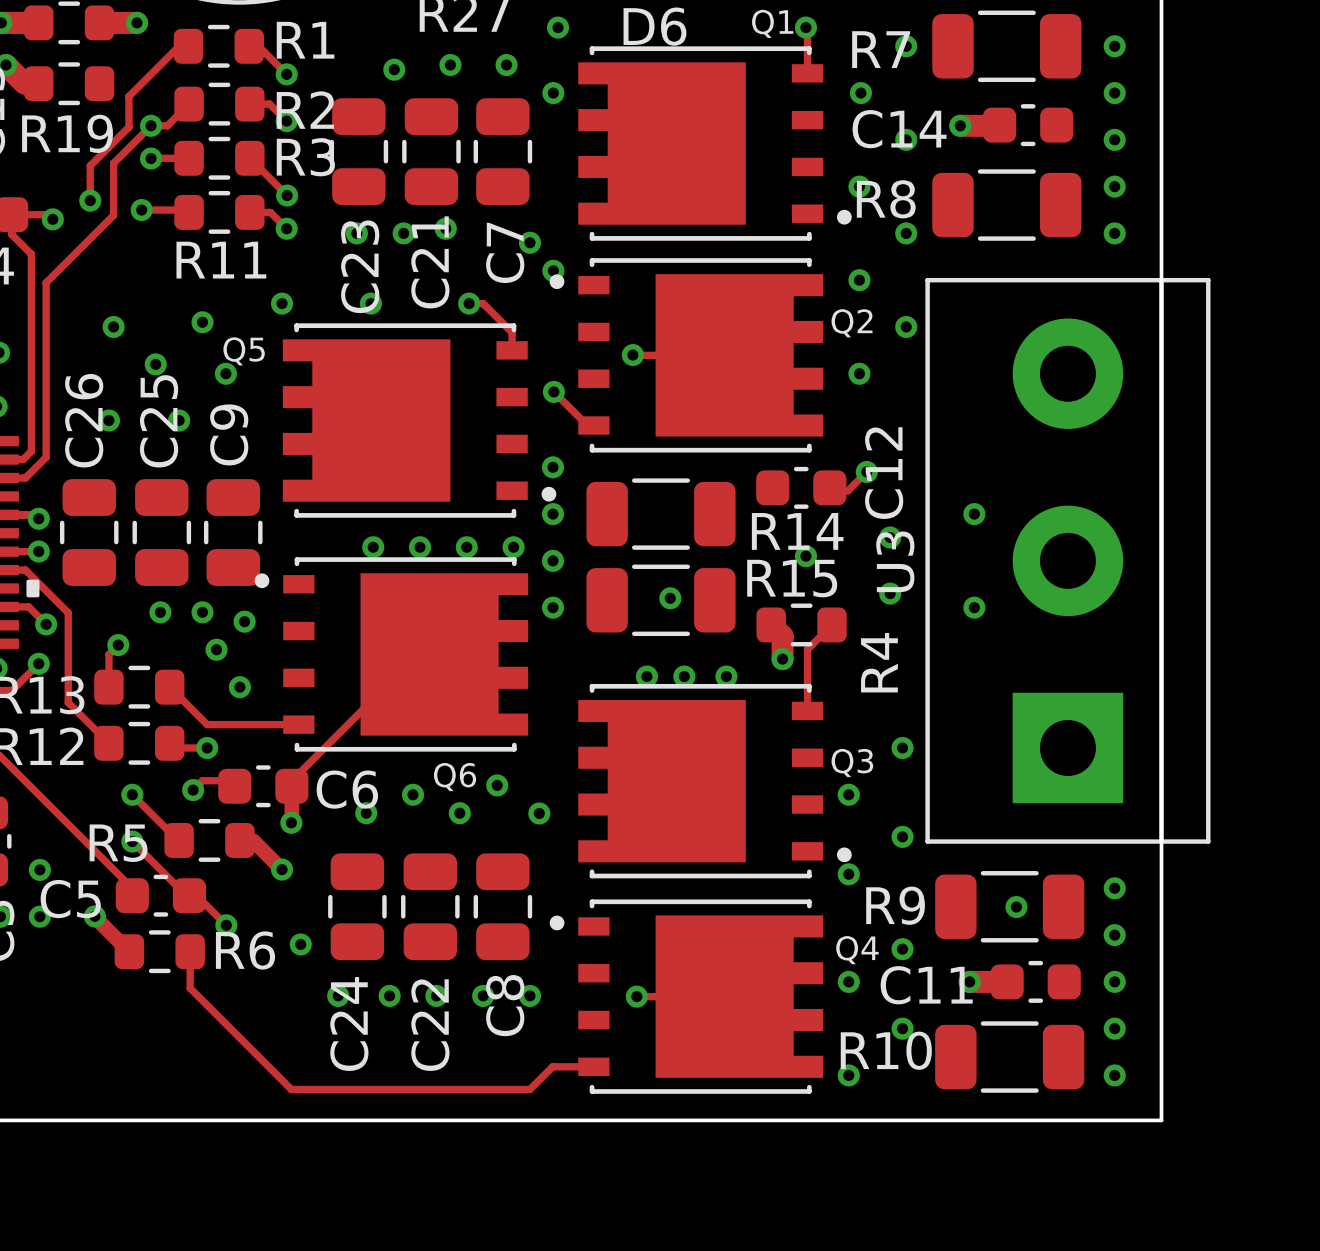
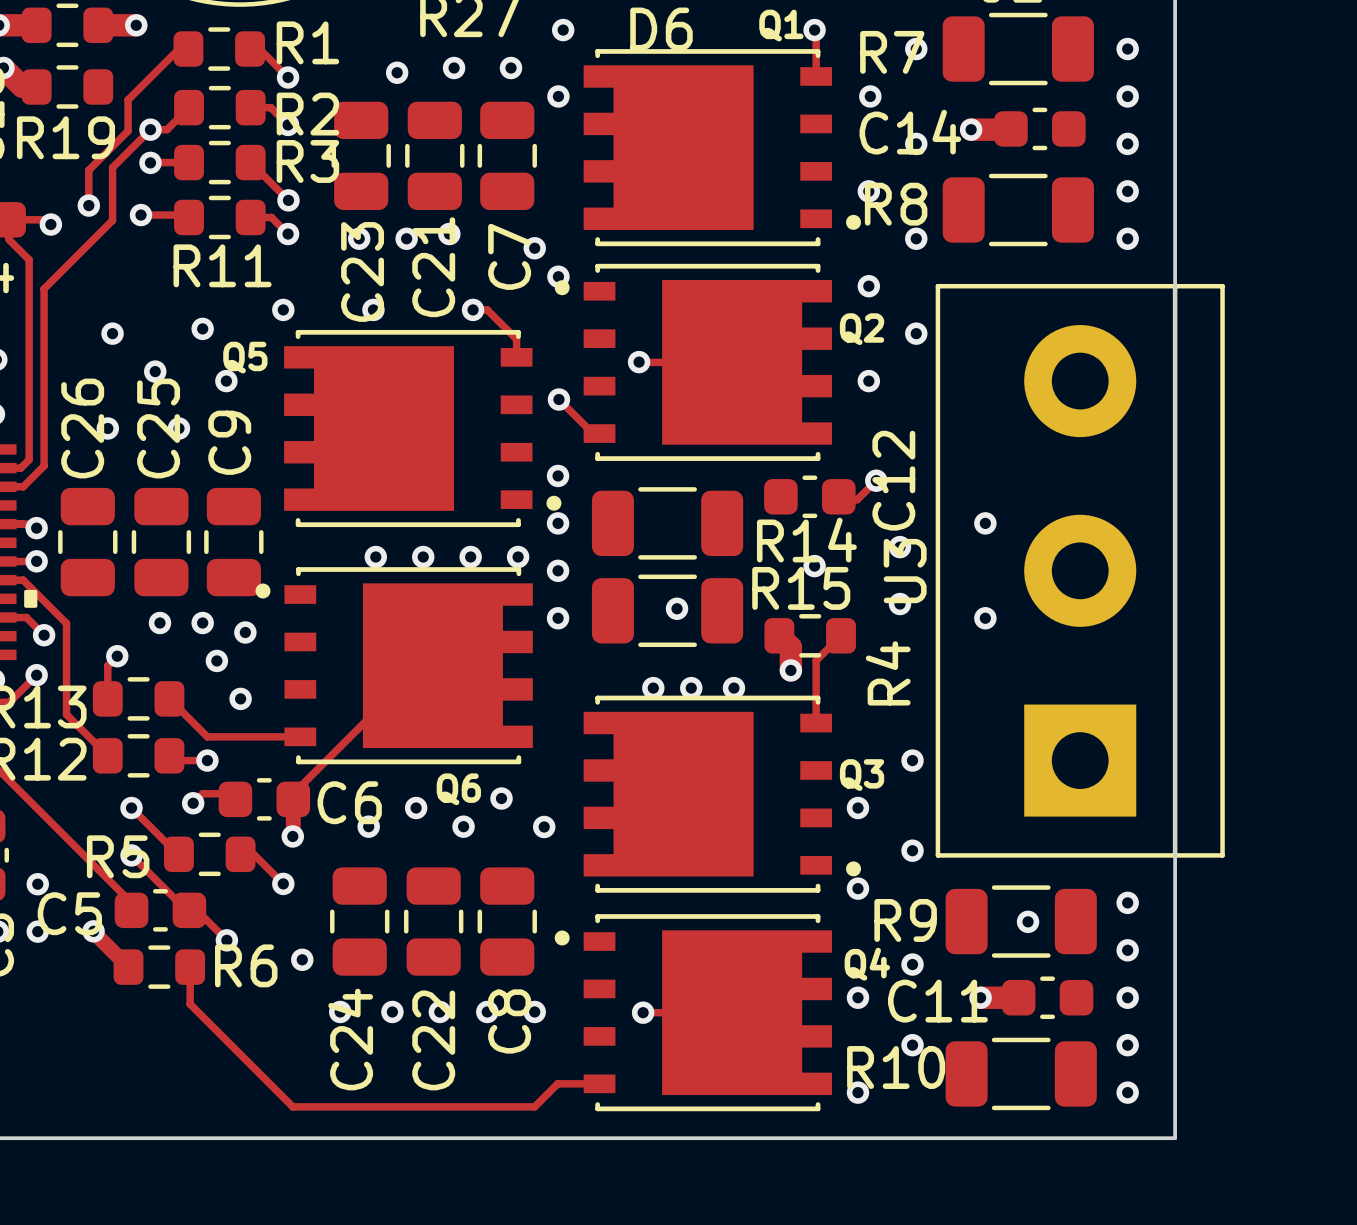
track width: thick (252, 840) (282, 869) -> thin (253, 854) (283, 883)

